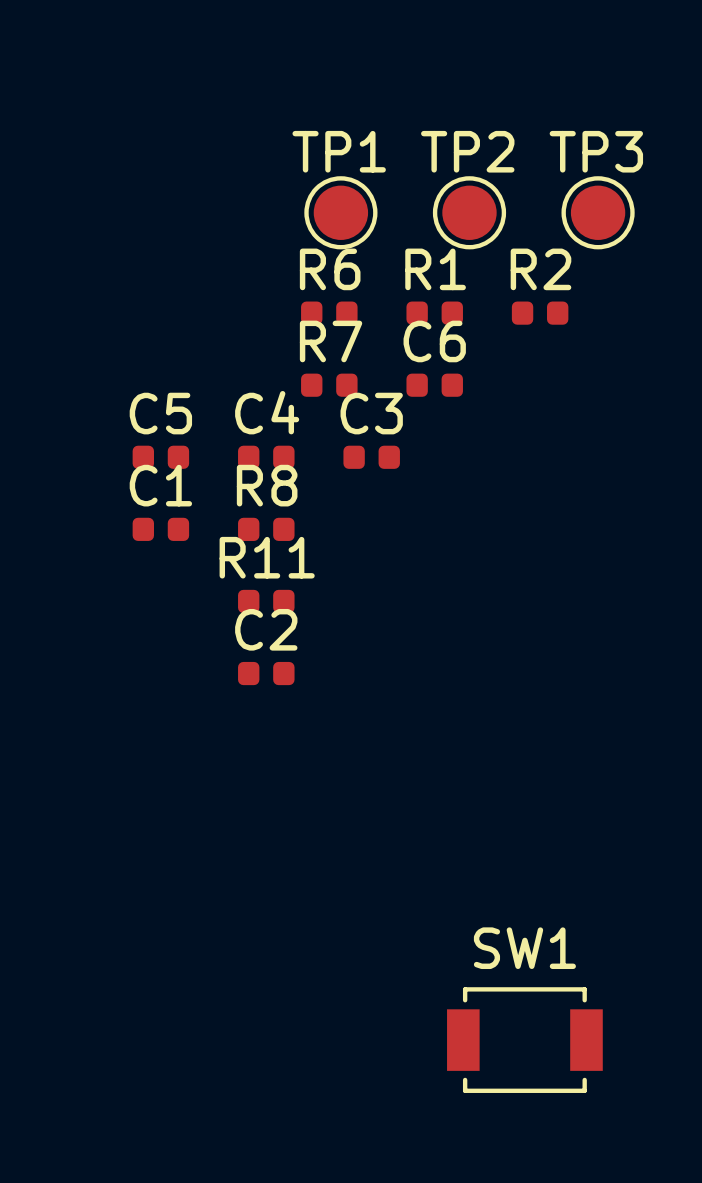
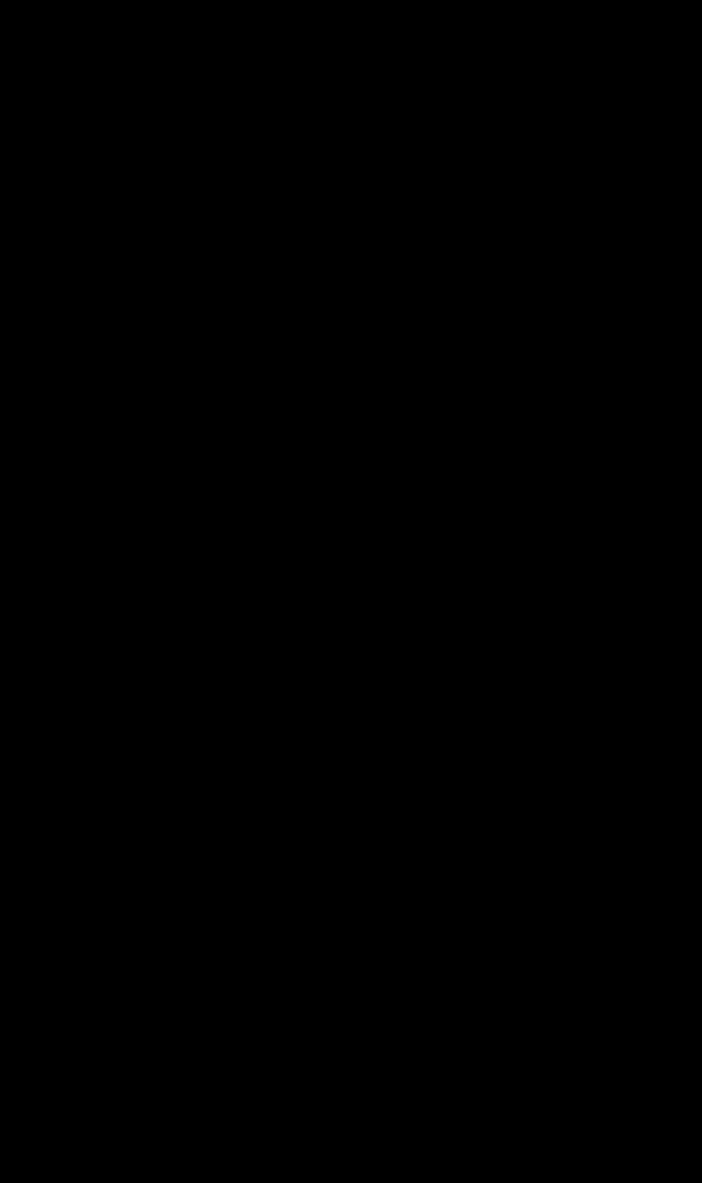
TP1: (340, 212) -> none
TP2: (469, 212) -> none
TP3: (598, 212) -> none
R6: (329, 313) -> none
R1: (434, 313) -> none
R2: (540, 313) -> none
R7: (329, 385) -> none
C6: (434, 385) -> none
C5: (160, 457) -> none
C4: (266, 457) -> none
C3: (371, 457) -> none
C1: (160, 529) -> none
R8: (266, 529) -> none
R11: (266, 601) -> none
C2: (266, 673) -> none
SW1: (524, 1040) -> none

